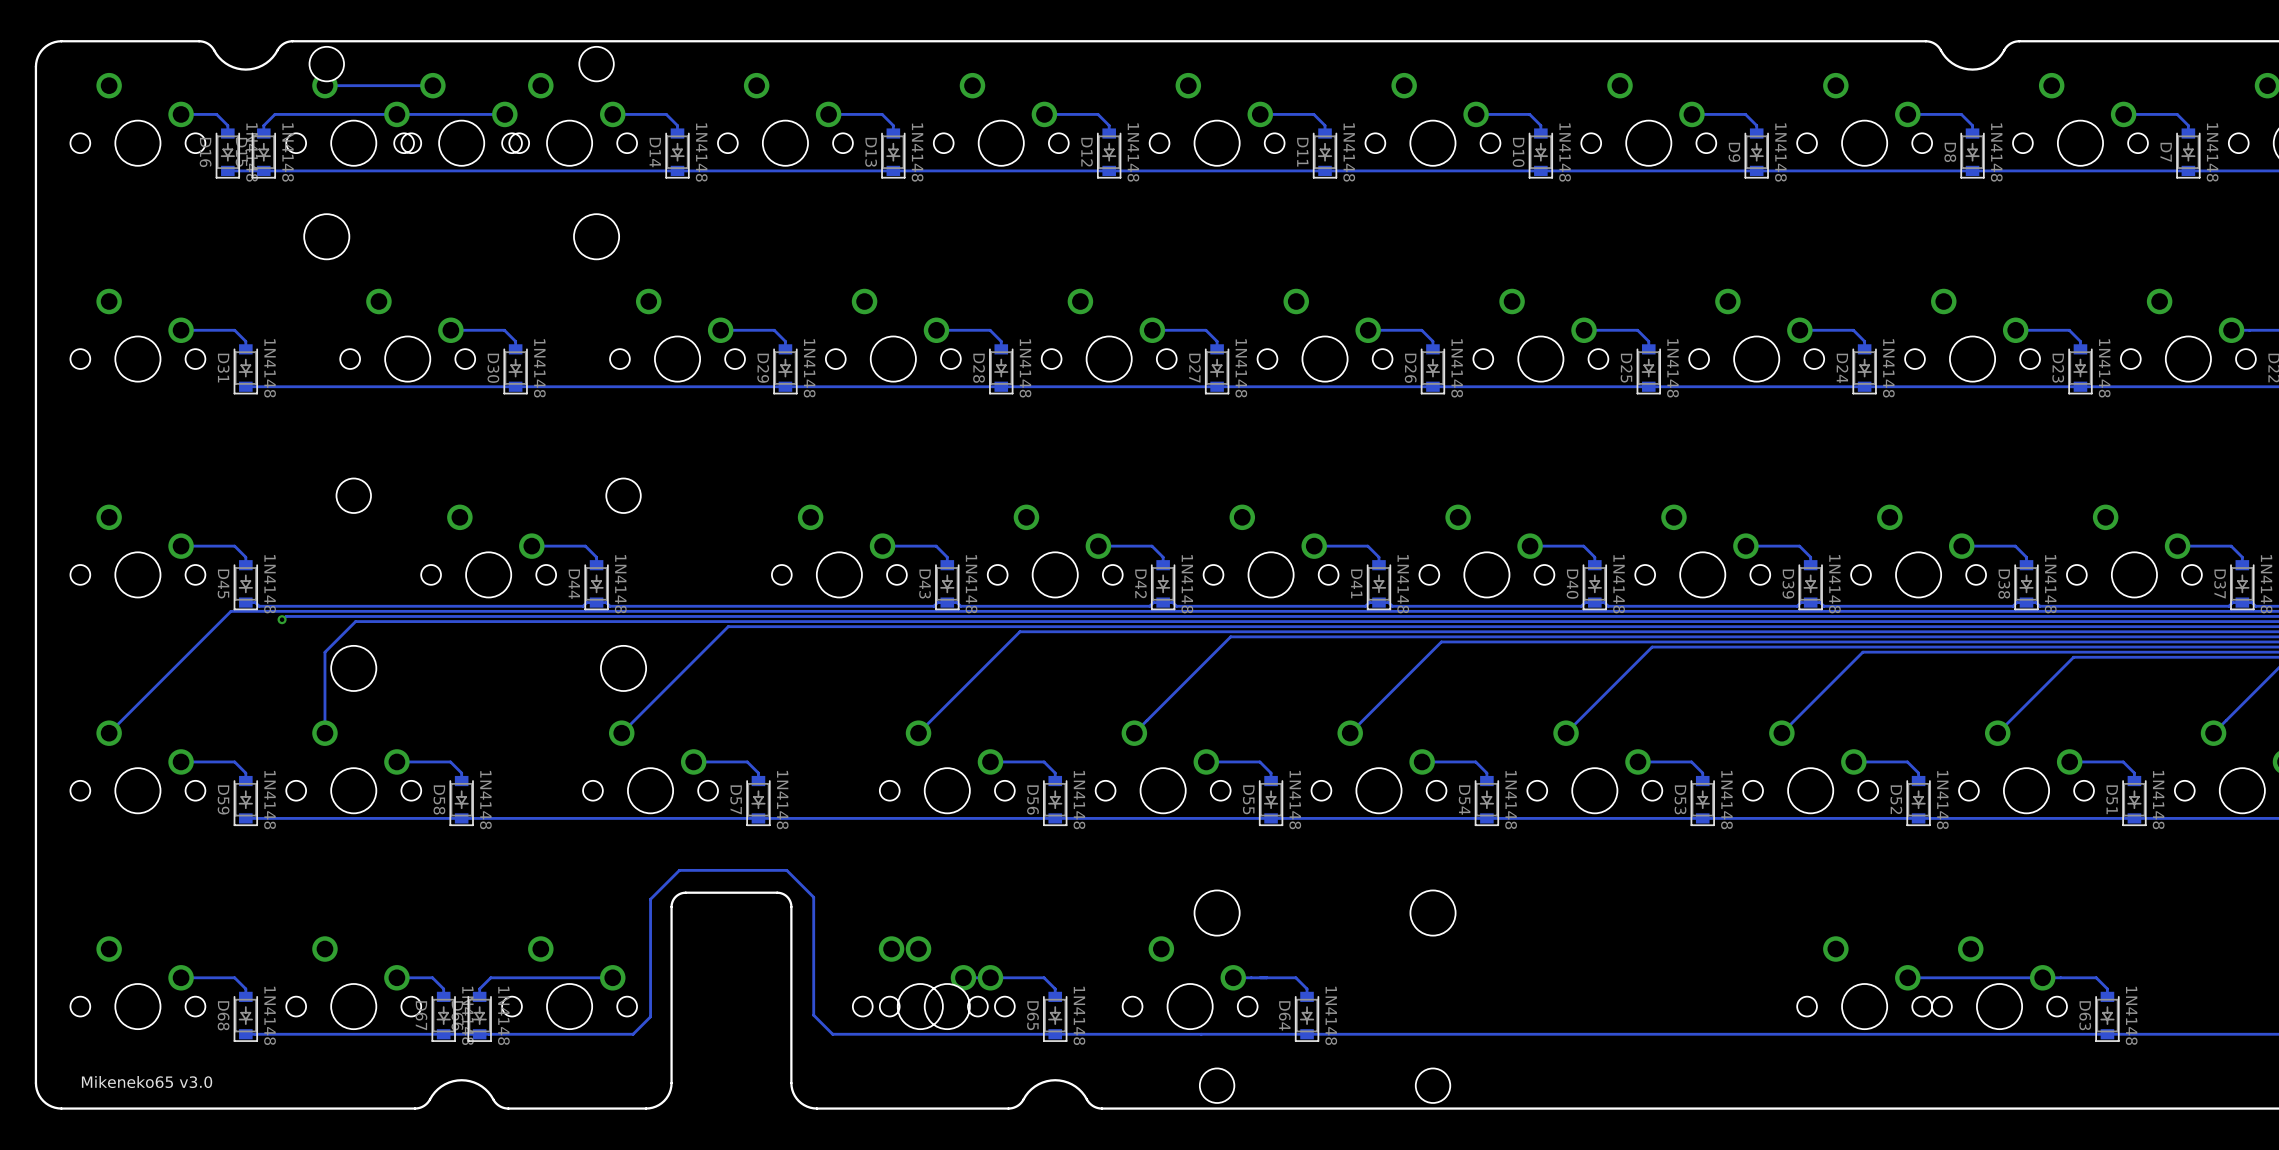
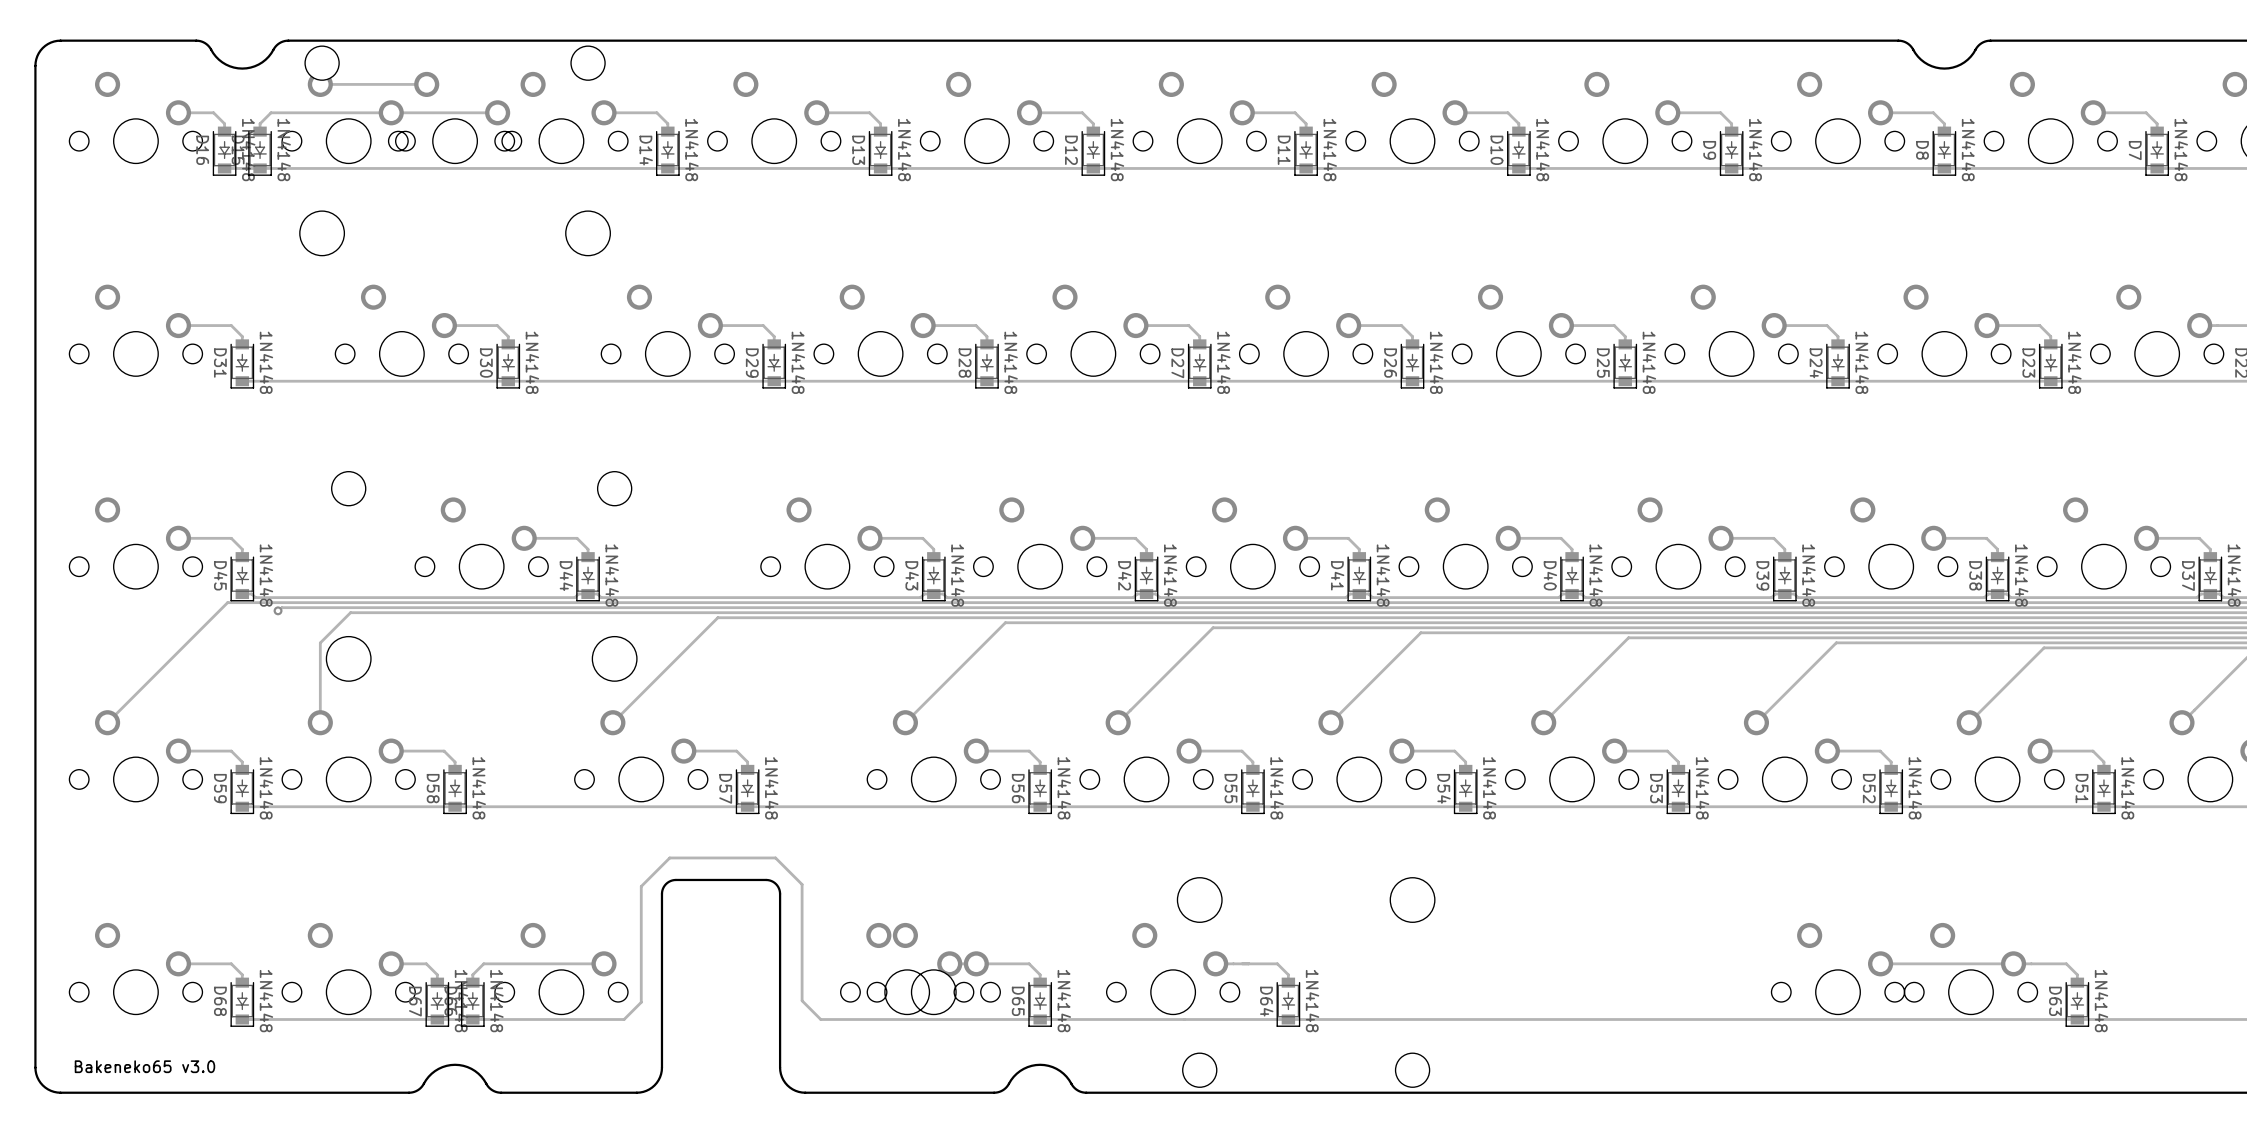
text: Mikeneko65 v3.0 (147, 1082) -> Bakeneko65 v3.0 (144, 1066)

